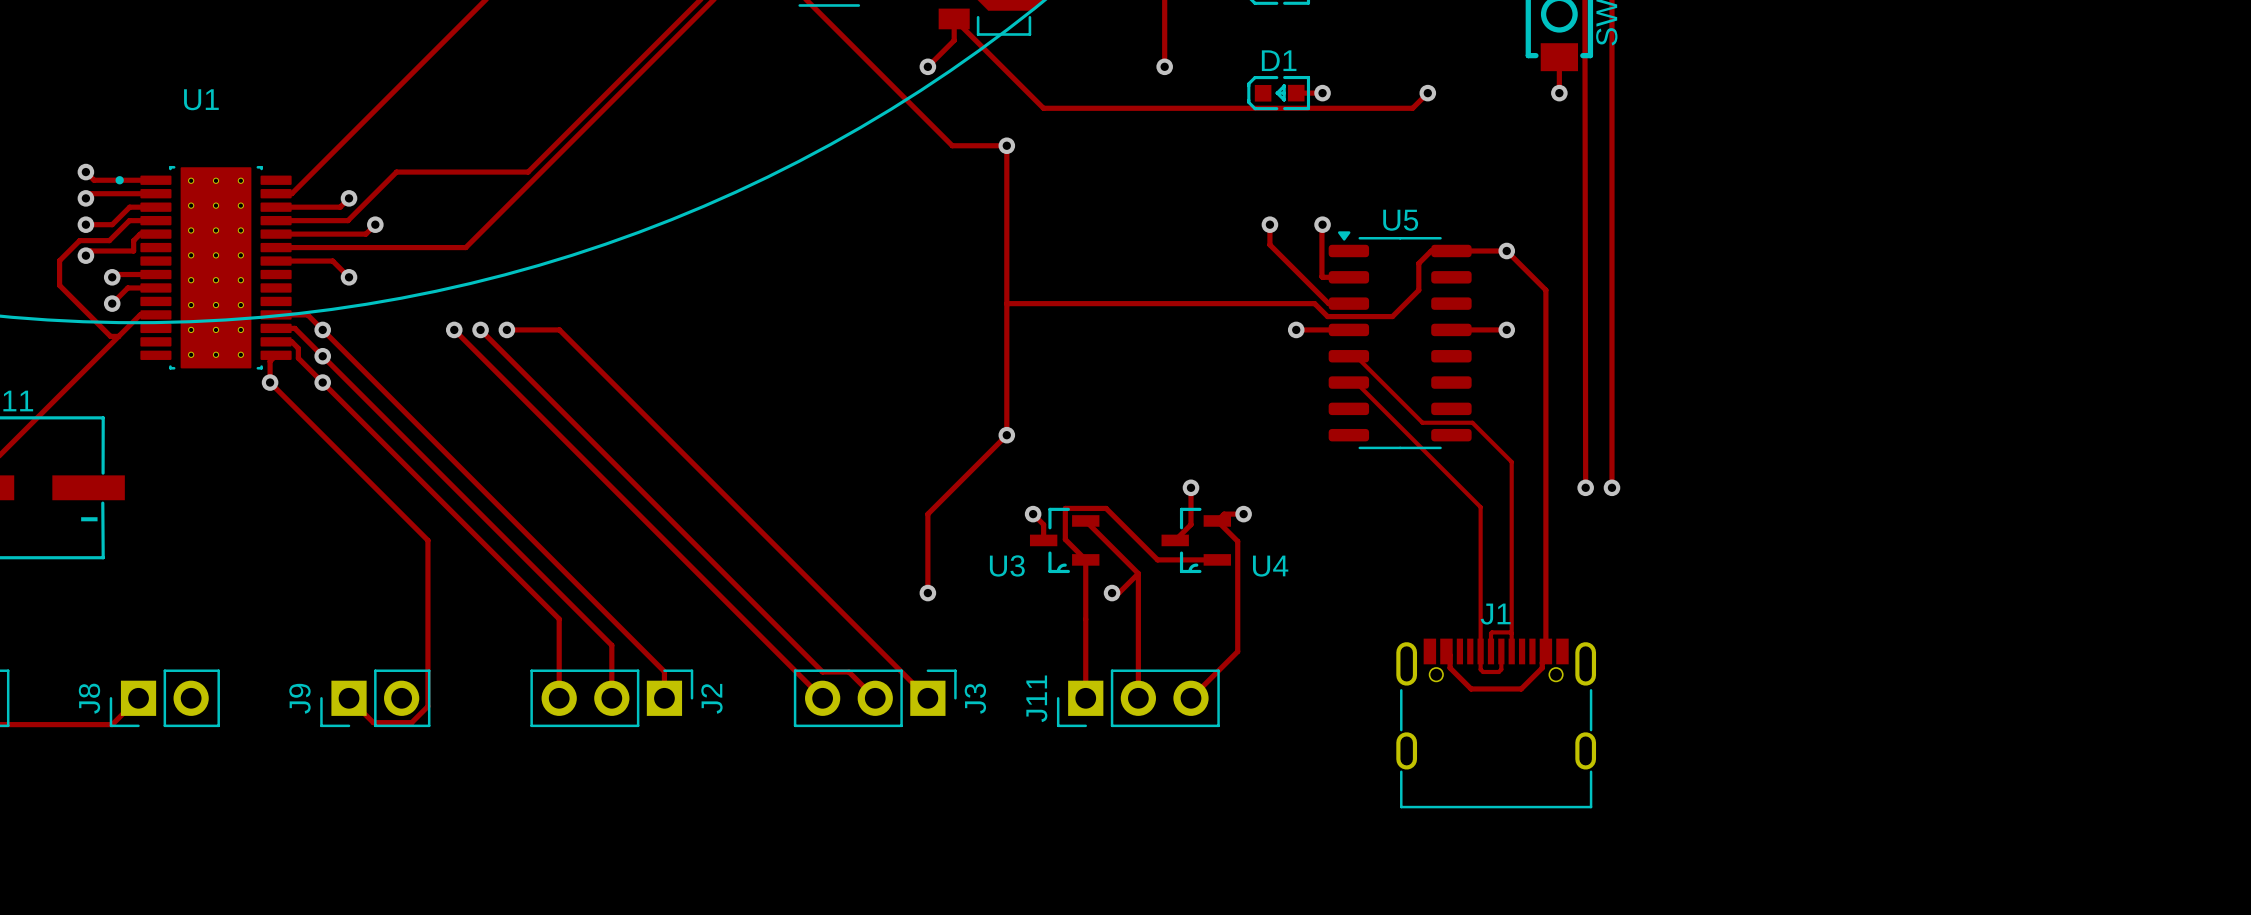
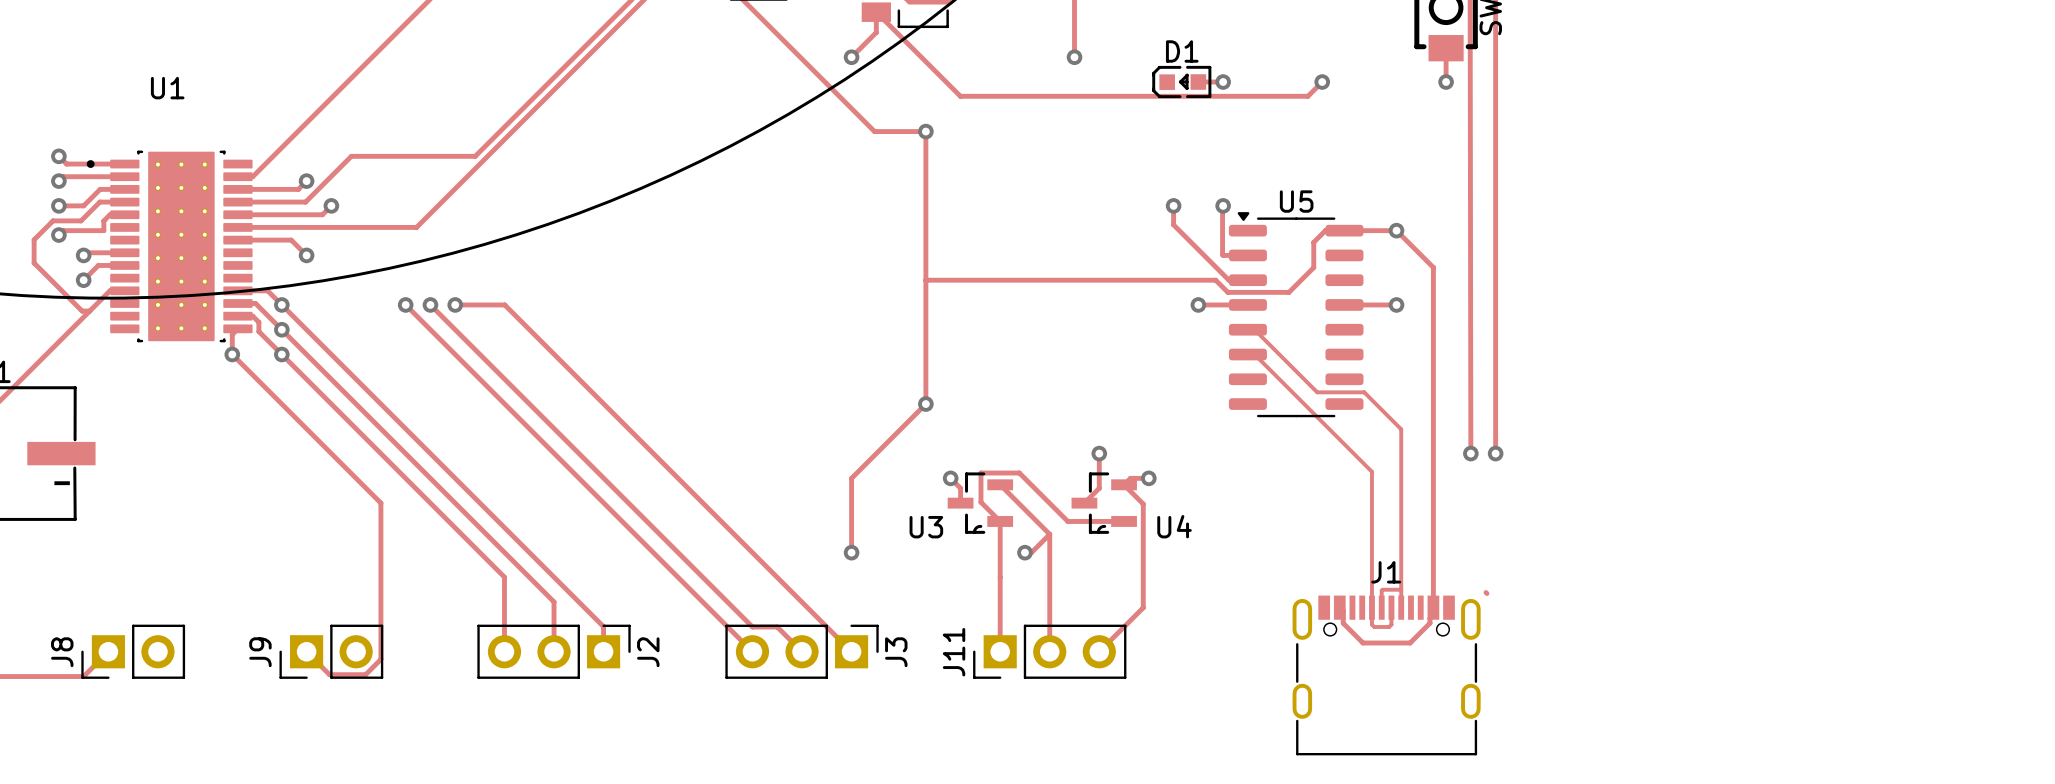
track: none -> (1485, 592) (1486, 593)

